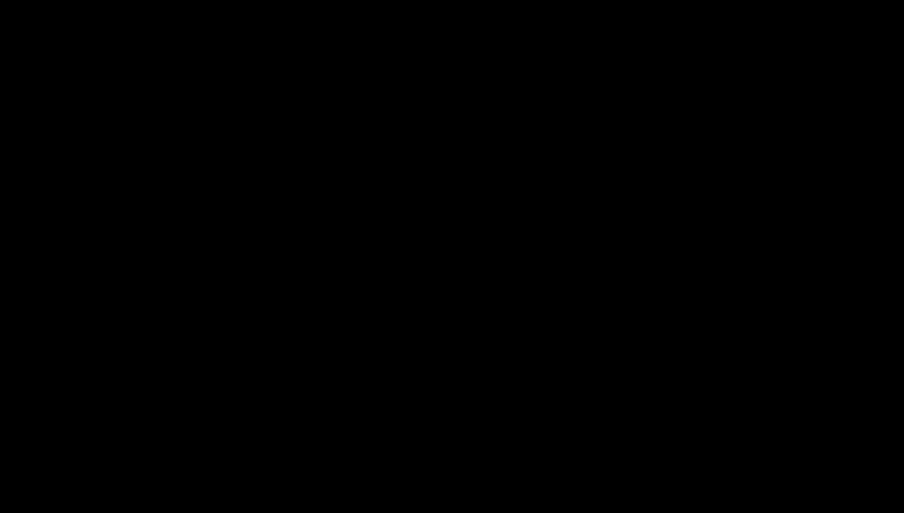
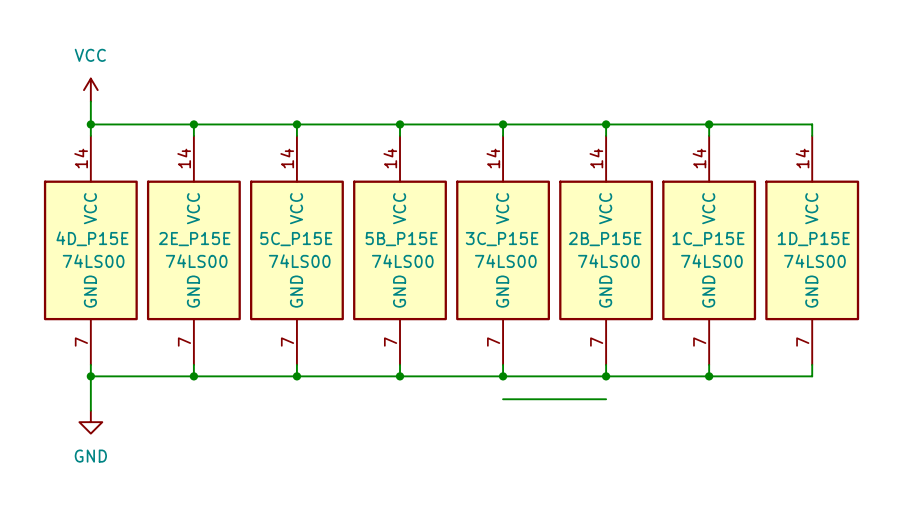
power symbol: none -> VCC (90, 90)
wire: none -> (90, 101) (90, 135)
wire: none -> (90, 124) (812, 124) (812, 135)
junction: none -> (90, 124)
wire: none -> (193, 124) (193, 135)
junction: none -> (193, 124)
wire: none -> (296, 124) (296, 135)
junction: none -> (296, 124)
wire: none -> (400, 124) (400, 135)
junction: none -> (400, 124)
wire: none -> (503, 124) (503, 135)
junction: none -> (503, 124)
wire: none -> (606, 124) (606, 135)
junction: none -> (606, 124)
wire: none -> (709, 124) (709, 135)
junction: none -> (709, 124)
4D_P15E: none -> 74LS00 (90, 250)
2E_P15E: none -> 74LS00 (193, 250)
5C_P15E: none -> 74LS00 (296, 250)
5B_P15E: none -> 74LS00 (400, 250)
3C_P15E: none -> 74LS00 (503, 250)
2B_P15E: none -> 74LS00 (606, 250)
1C_P15E: none -> 74LS00 (709, 250)
1D_P15E: none -> 74LS00 (812, 250)
wire: none -> (90, 364) (90, 410)
wire: none -> (193, 364) (193, 376)
wire: none -> (296, 364) (296, 376)
wire: none -> (400, 364) (400, 376)
wire: none -> (503, 364) (503, 376)
wire: none -> (606, 364) (606, 376)
wire: none -> (709, 364) (709, 376)
wire: none -> (812, 364) (812, 376) (90, 376)
junction: none -> (90, 376)
junction: none -> (193, 376)
junction: none -> (296, 376)
junction: none -> (400, 376)
junction: none -> (503, 376)
junction: none -> (606, 376)
junction: none -> (709, 376)
wire: none -> (503, 399) (606, 399)
power symbol: none -> GND (90, 422)

